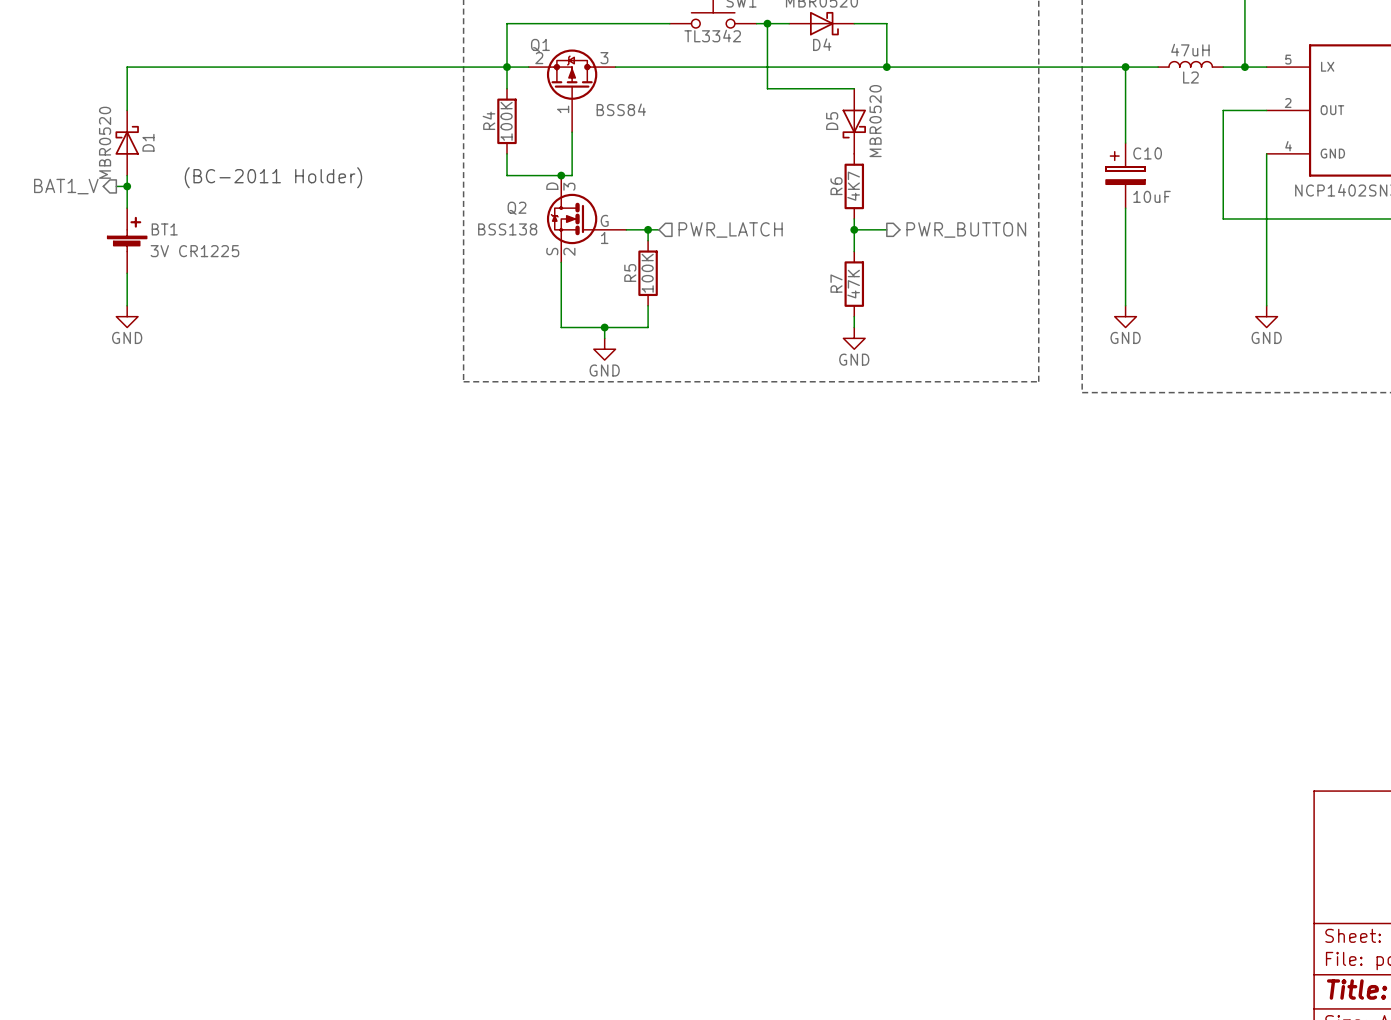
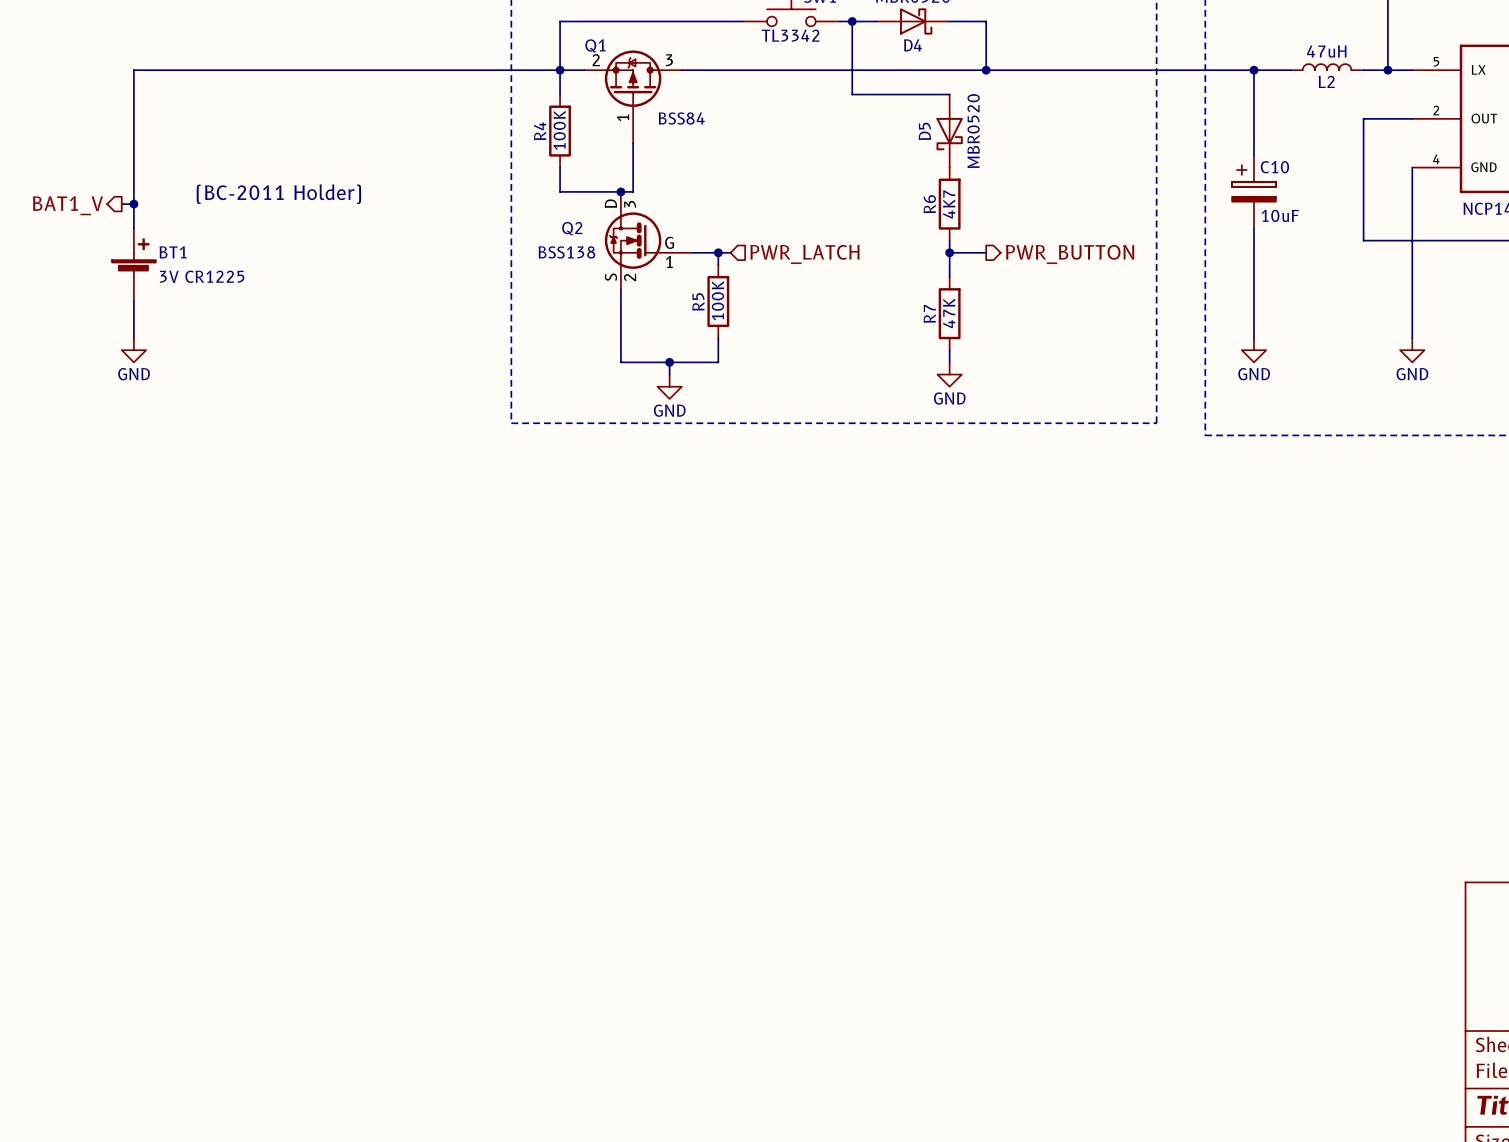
D1: MBR0520 (127, 143) -> none

